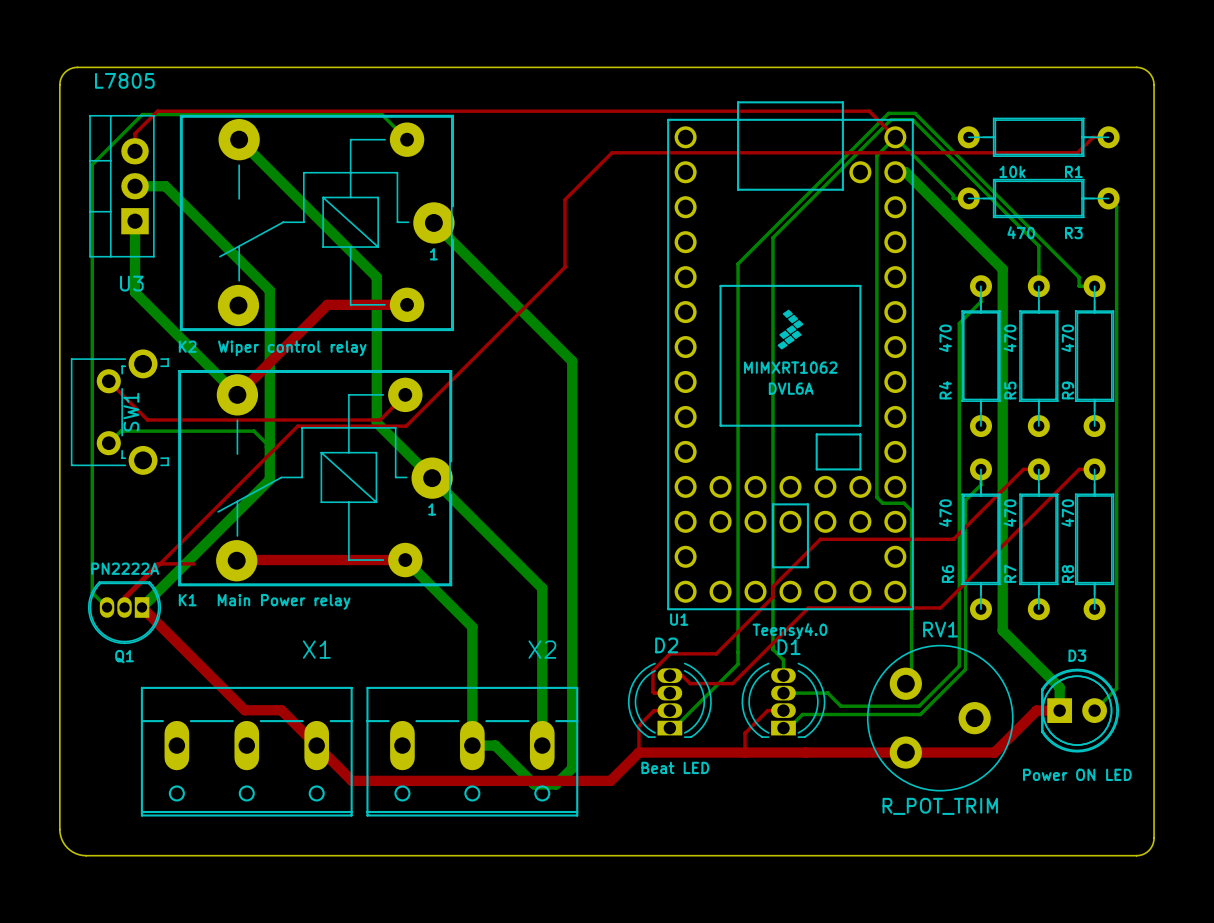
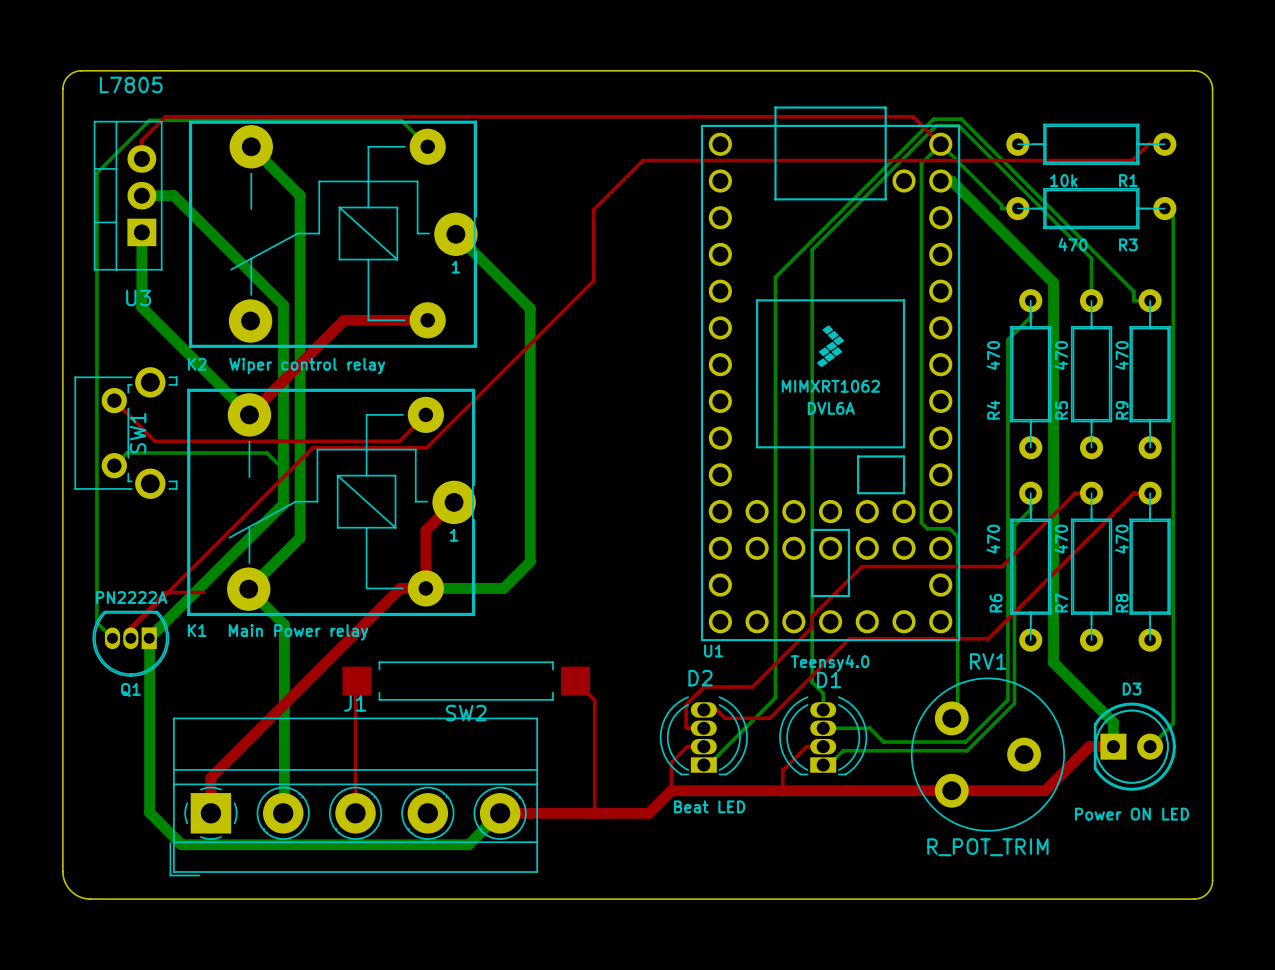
bottom track: (285, 186) (376, 277) (376, 422) (542, 588) (542, 745) -> (300, 195) (300, 537) (248, 589) (284, 624) (283, 813)
bottom track: (504, 293) (572, 361) (572, 768) (556, 784) (534, 784) (495, 745) (472, 745) (472, 627) (405, 560) -> (530, 308) (530, 561) (503, 588) (425, 588)
top track: none -> (454, 502) (425, 530) (425, 588) (411, 588)
top track: (237, 560) (380, 560) -> (214, 785) (210, 789) (210, 813) (210, 777) (400, 588)
top track: (142, 607) (244, 710) (281, 710) (352, 780) (610, 780) (617, 774) -> (500, 813) (648, 813)
bottom track: none -> (149, 638) (149, 812) (181, 844) (468, 844) (500, 813)
top track: none -> (356, 681) (355, 813)
SW2: none -> (466, 681)
top track: none -> (575, 681) (594, 700) (594, 813)
X1: (246, 751) -> none
X2: (472, 751) -> none
J1: none -> (353, 796)

